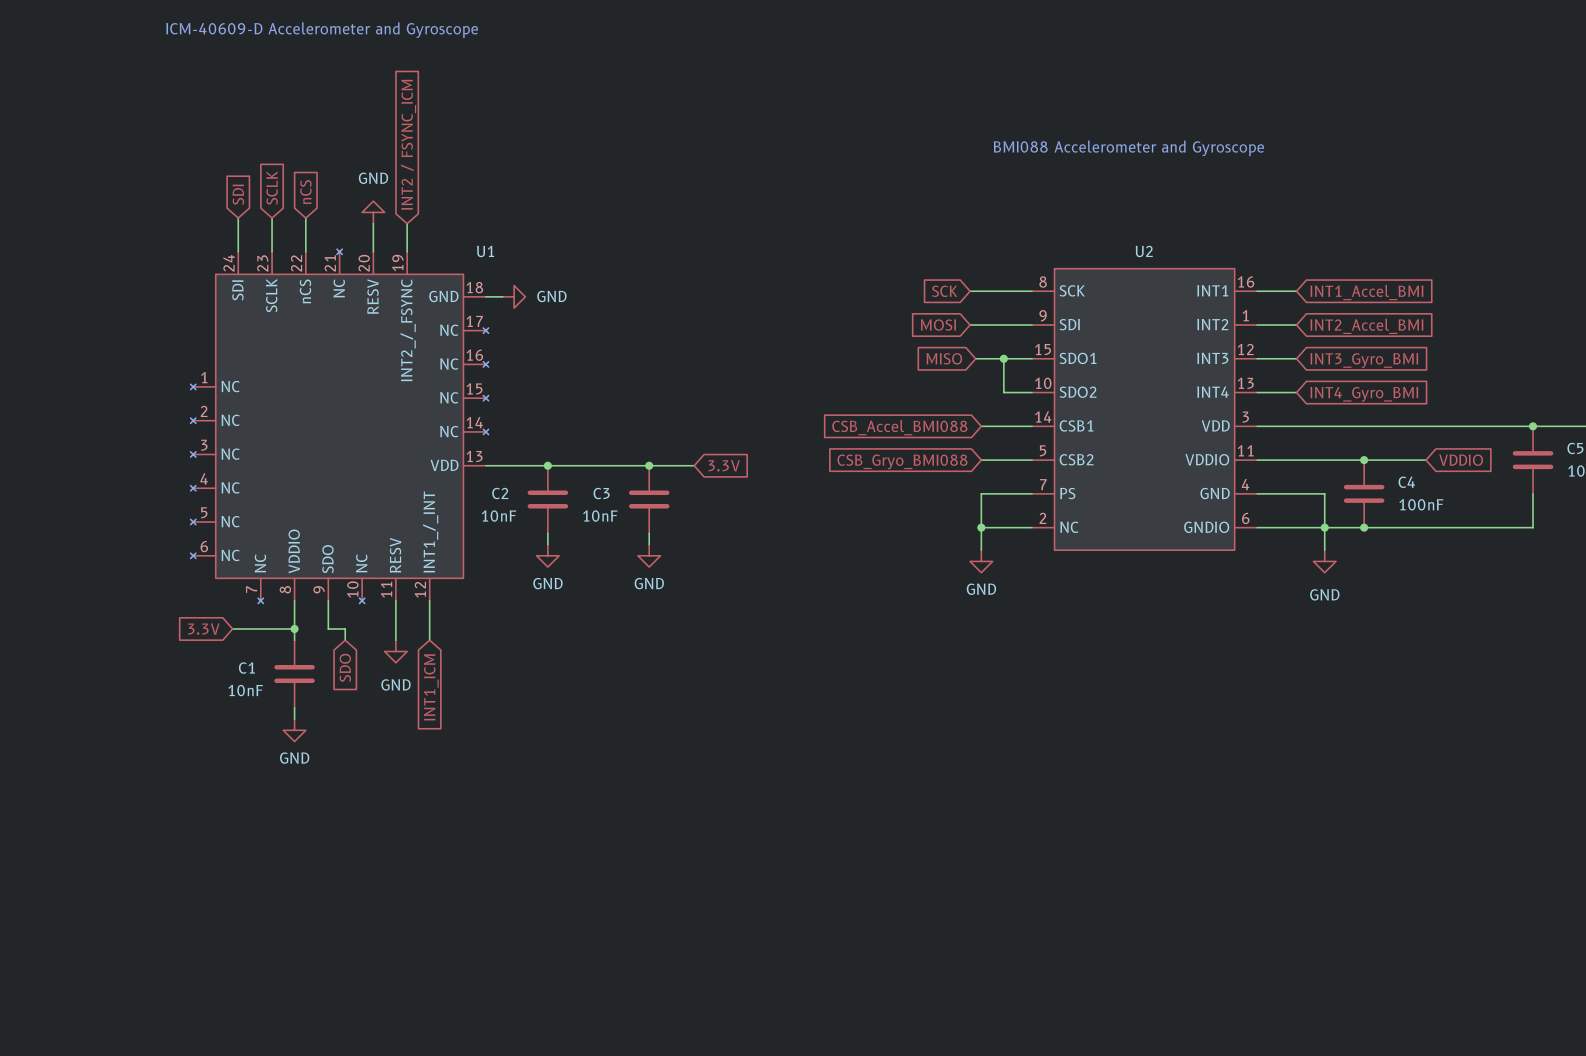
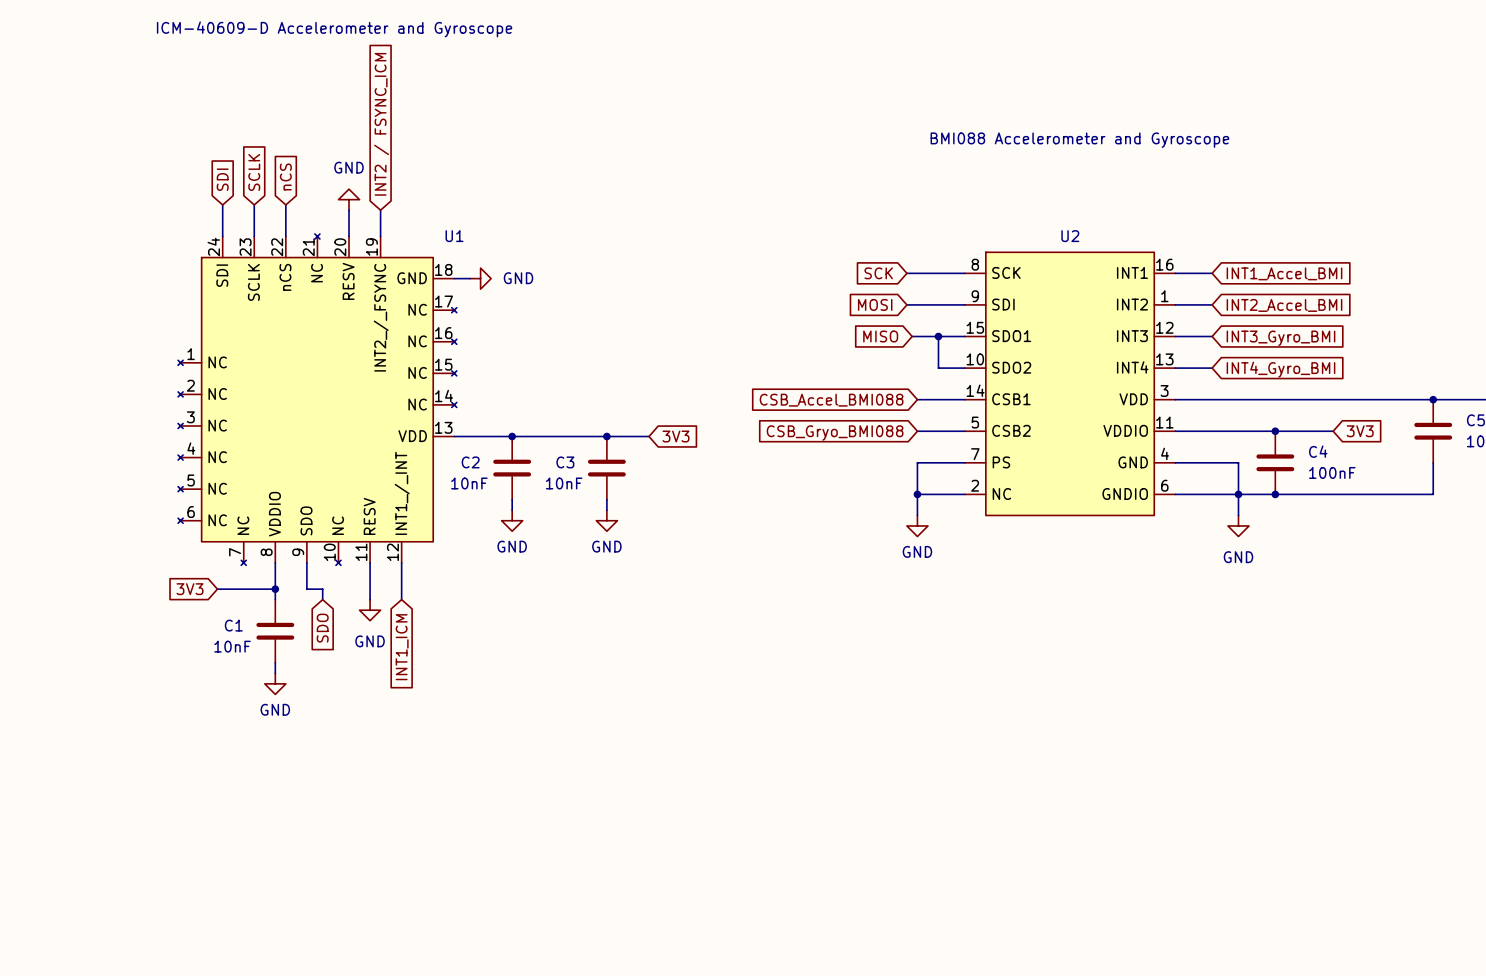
global label: VDDIO (1461, 460) -> 3V3 (1360, 431)
global label: 3.3V (724, 465) -> 3V3 (675, 436)
global label: 3.3V (203, 629) -> 3V3 (189, 589)

